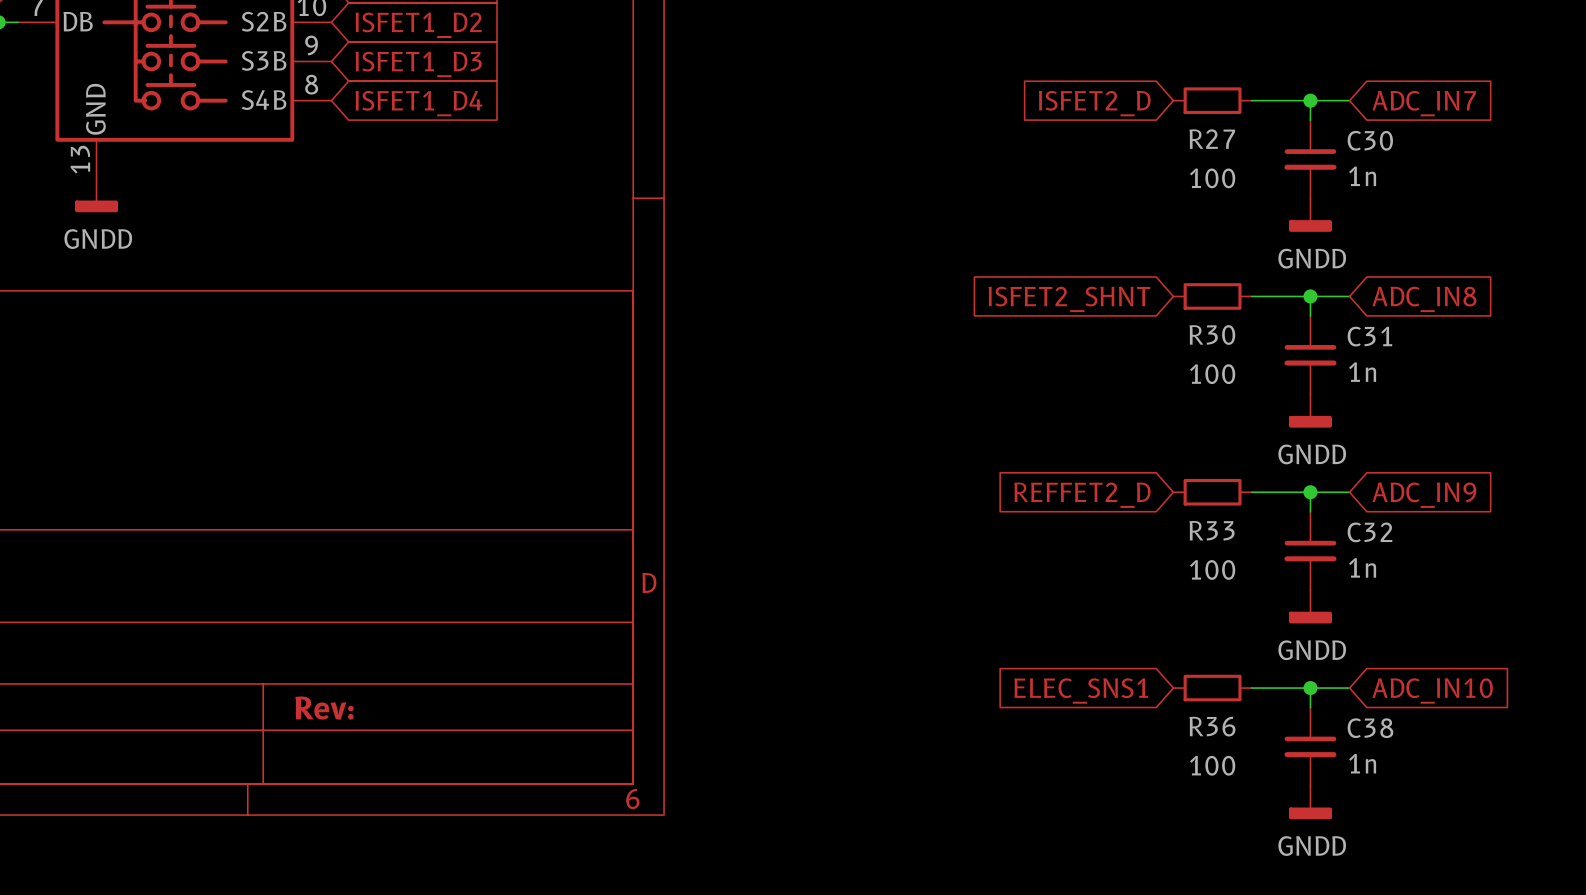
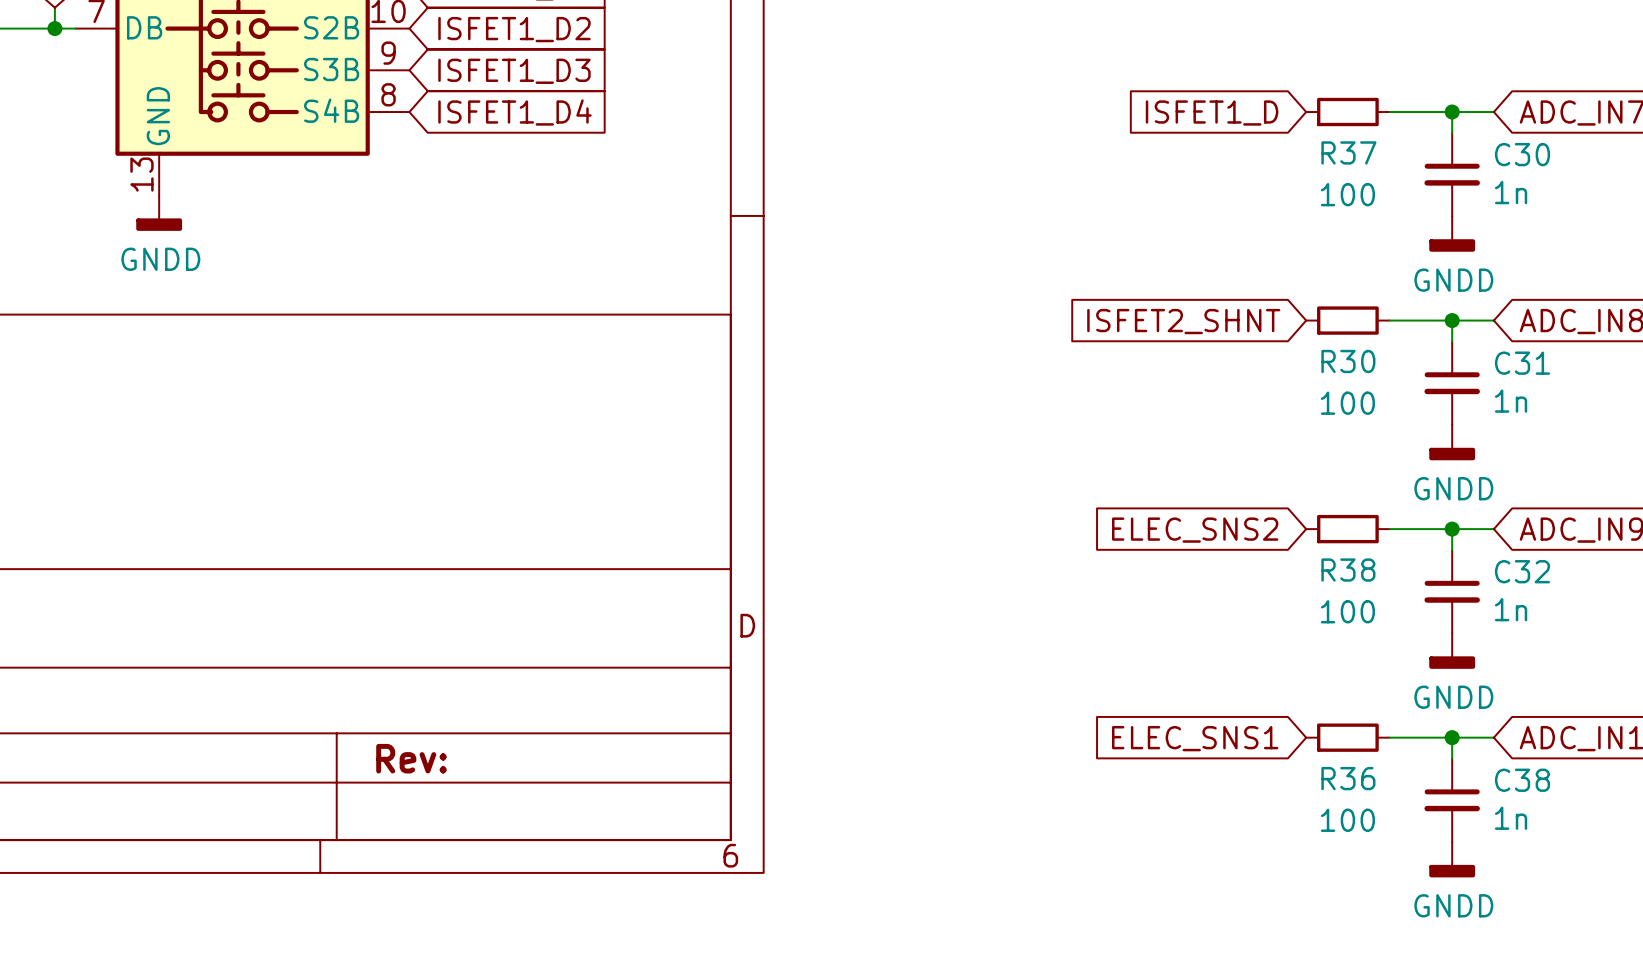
global label: ISFET2_D (1094, 103) -> ISFET1_D (1212, 113)
R27 name: R27 (1212, 139) -> R37 (1348, 152)
global label: REFFET2_D (1082, 495) -> ELEC_SNS2 (1195, 530)
R33 name: R33 (1212, 530) -> R38 (1348, 570)

